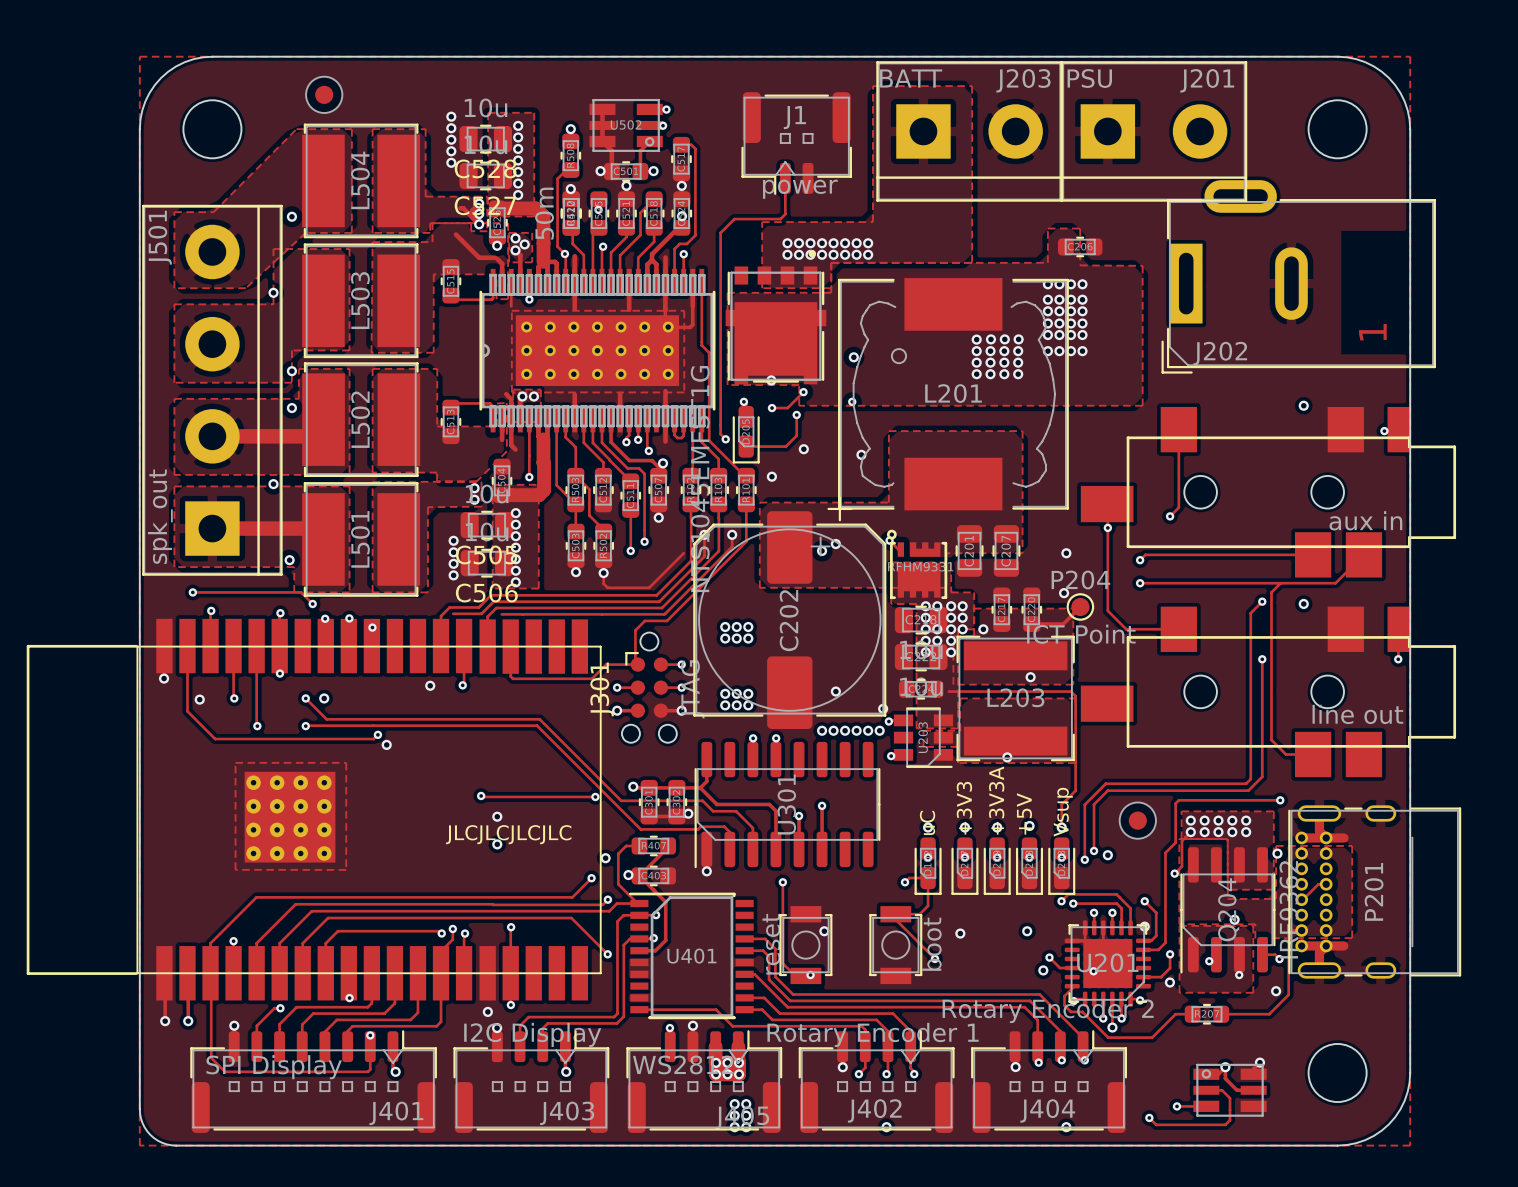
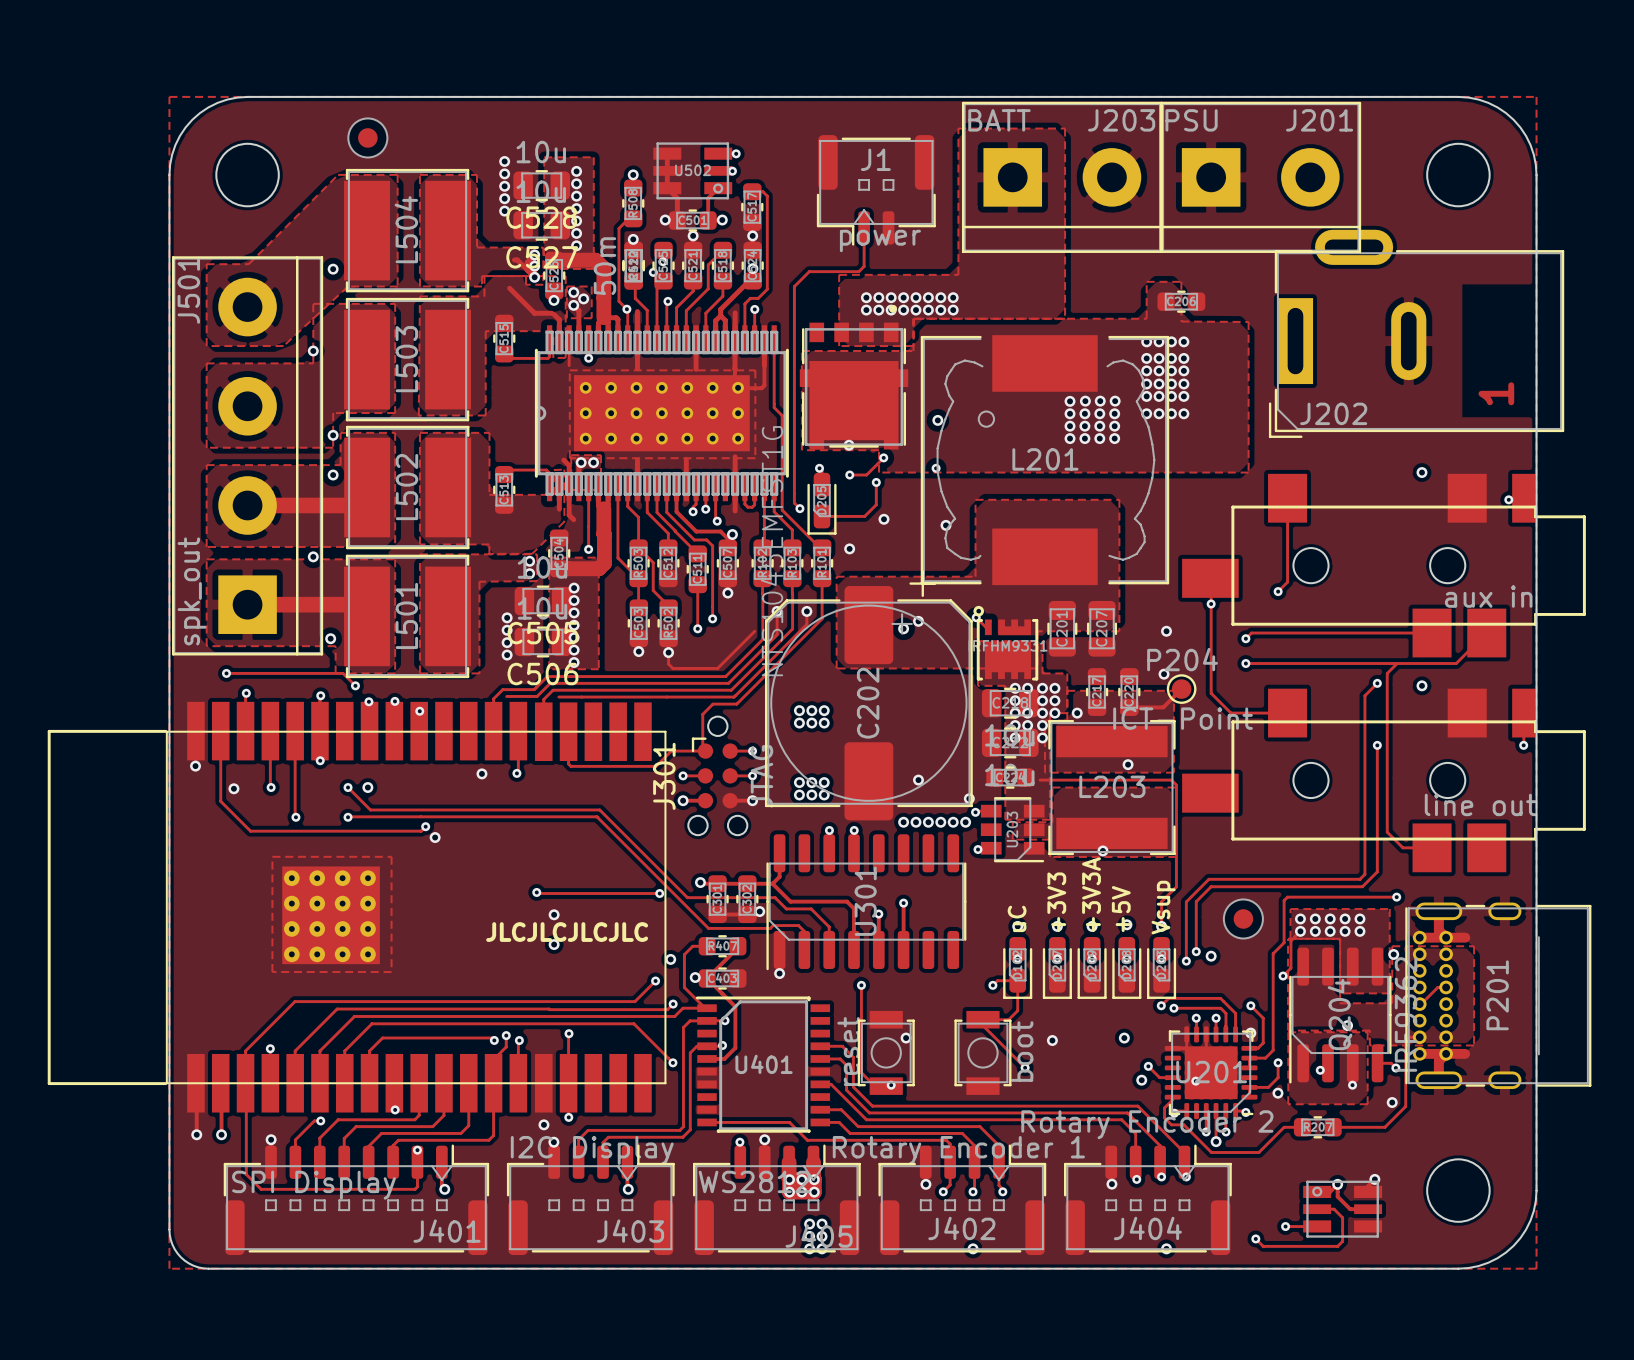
via: none -> (653, 272)

